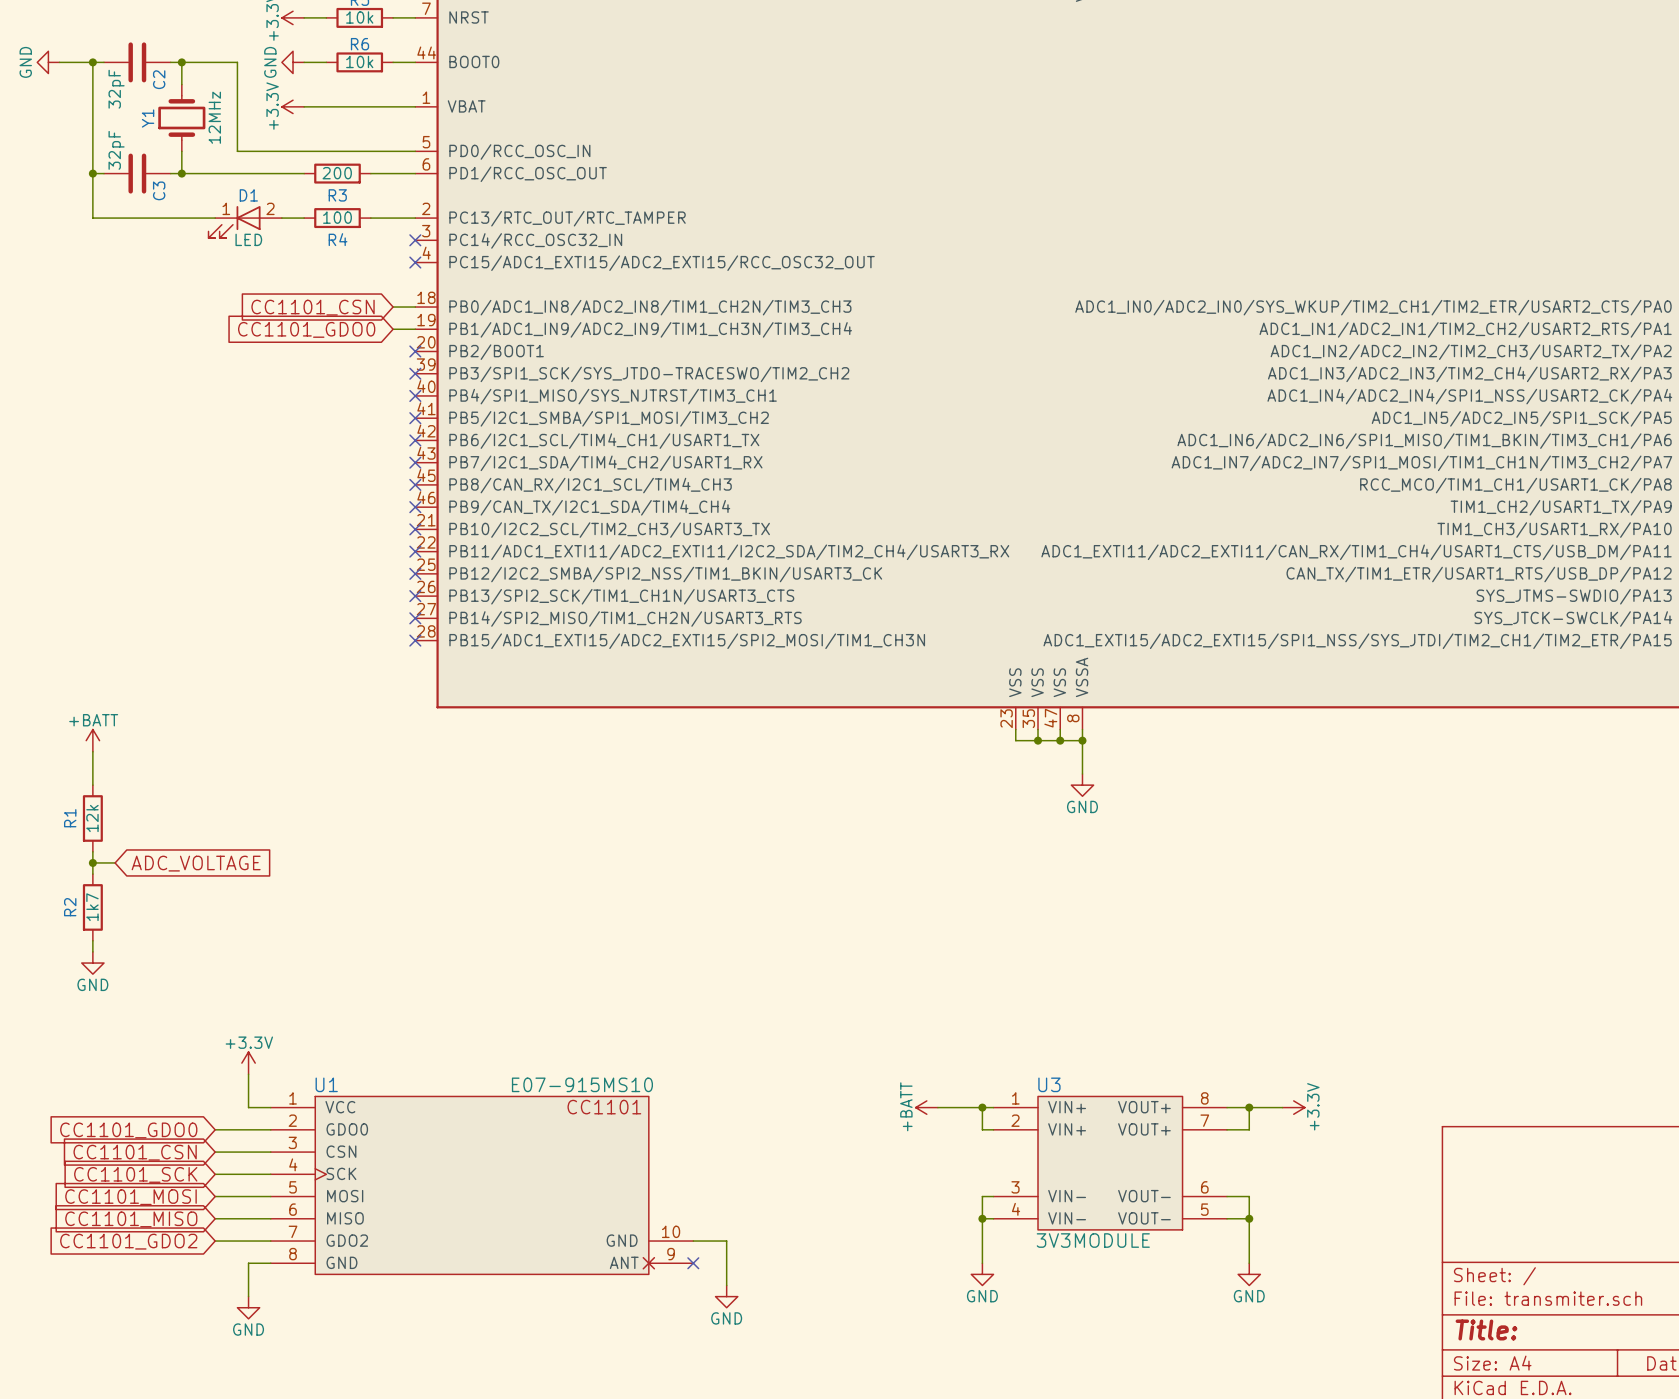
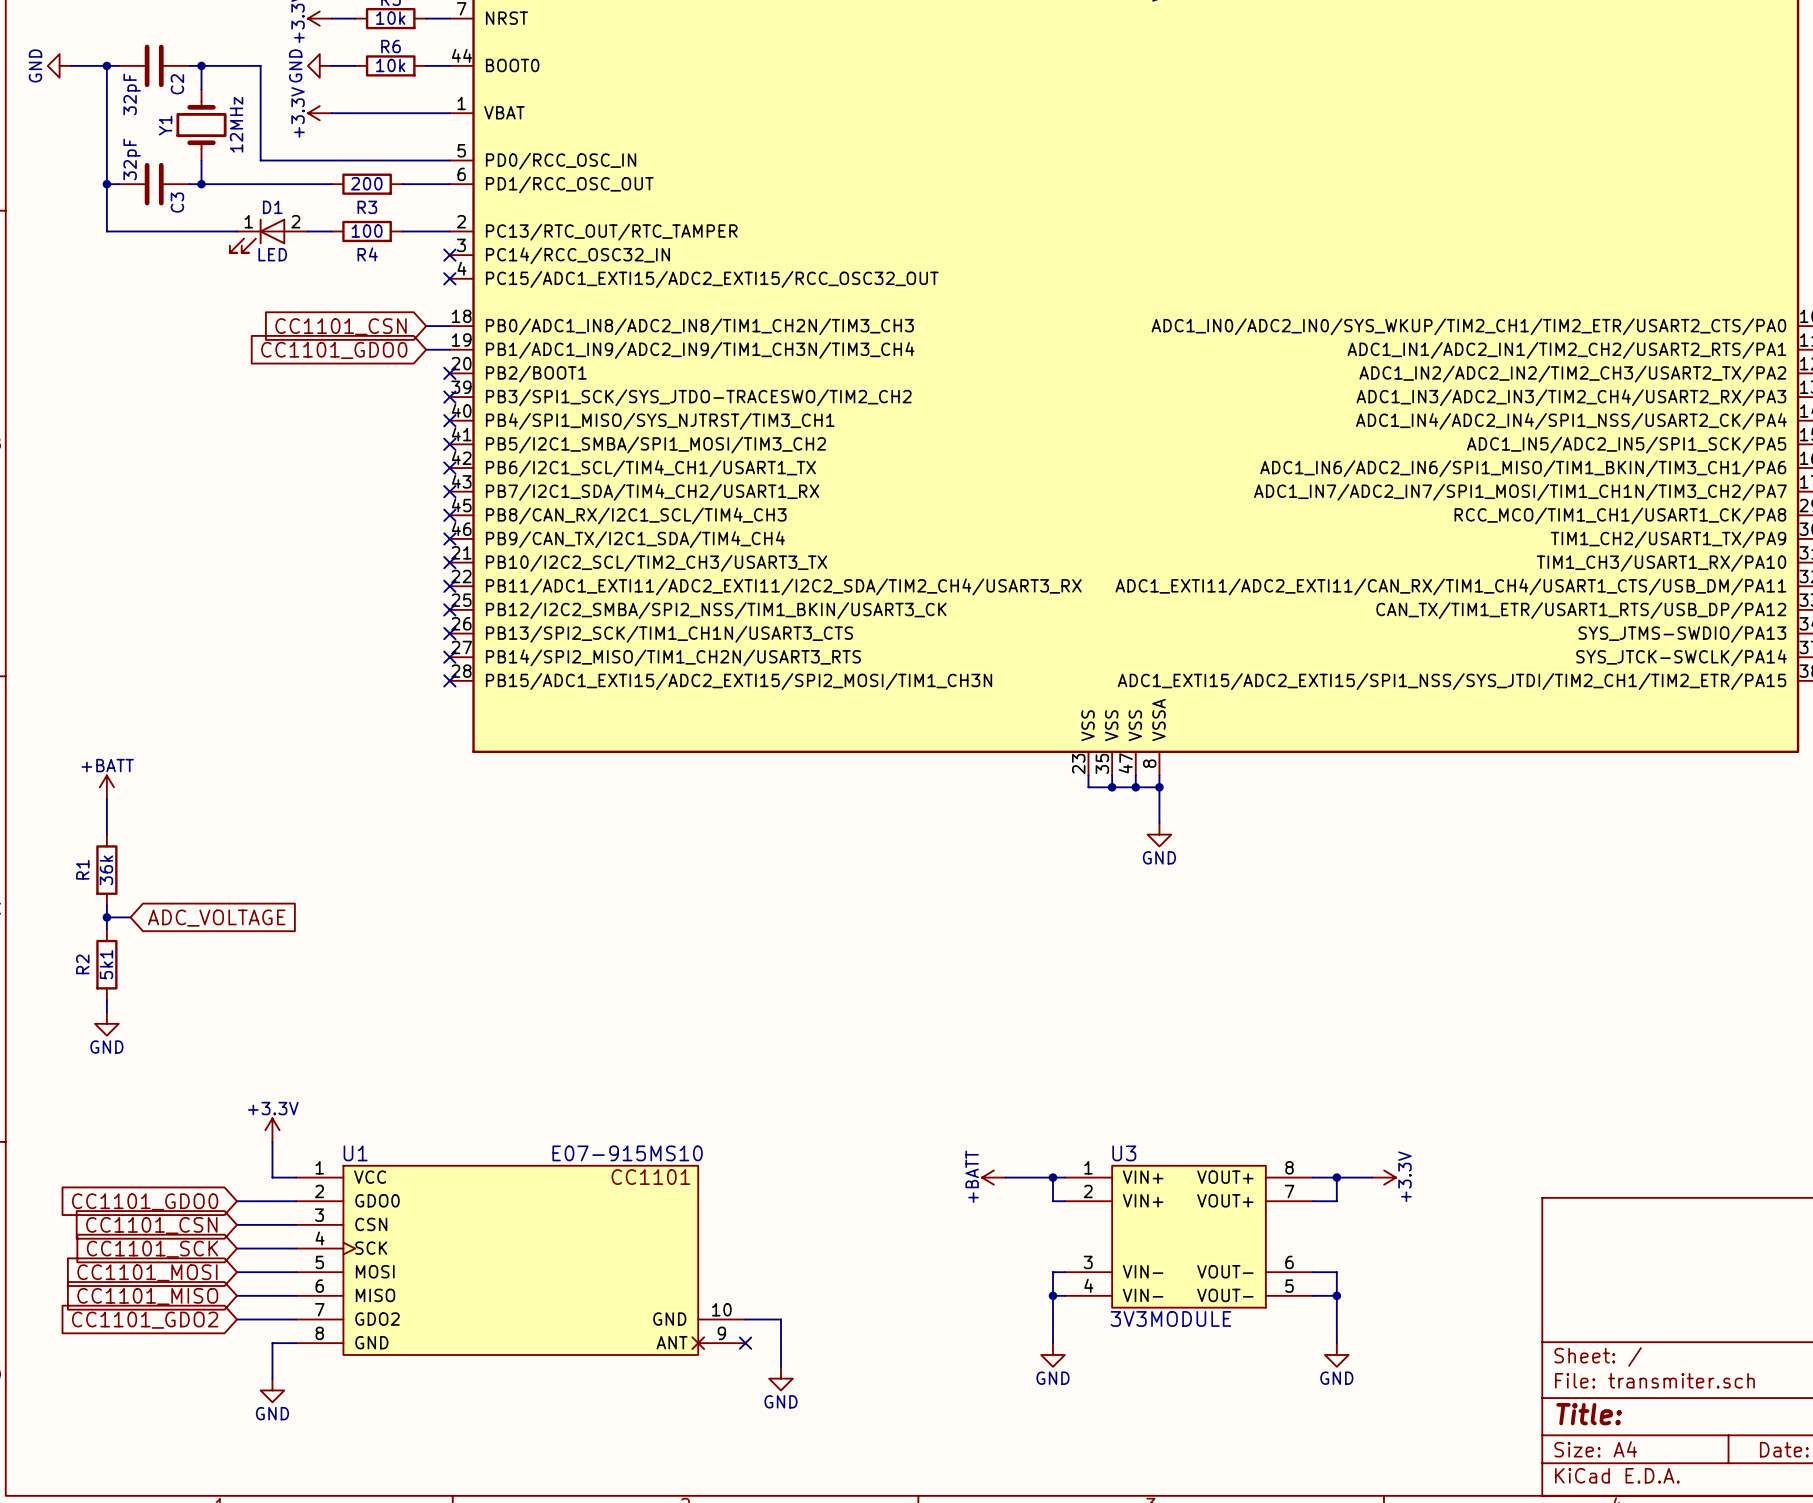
R1 value: 12k (92, 818) -> 36k (106, 870)
R2 value: 1k7 (92, 907) -> 5k1 (106, 964)

